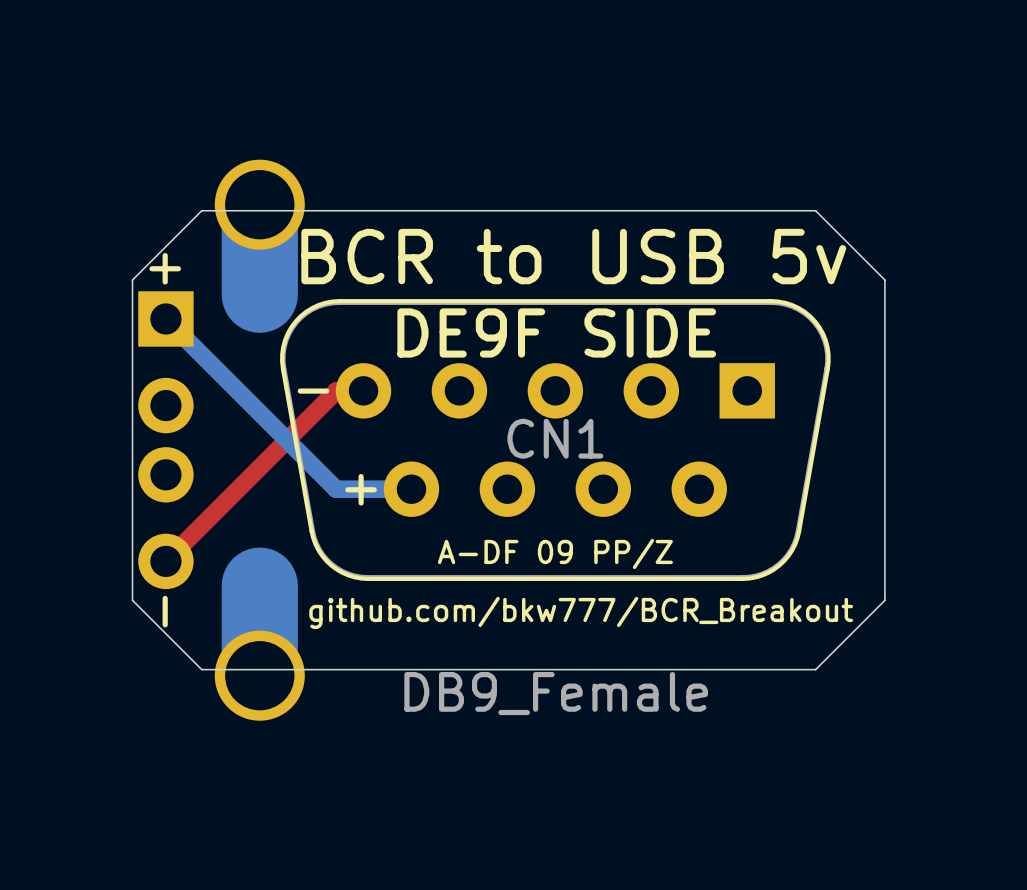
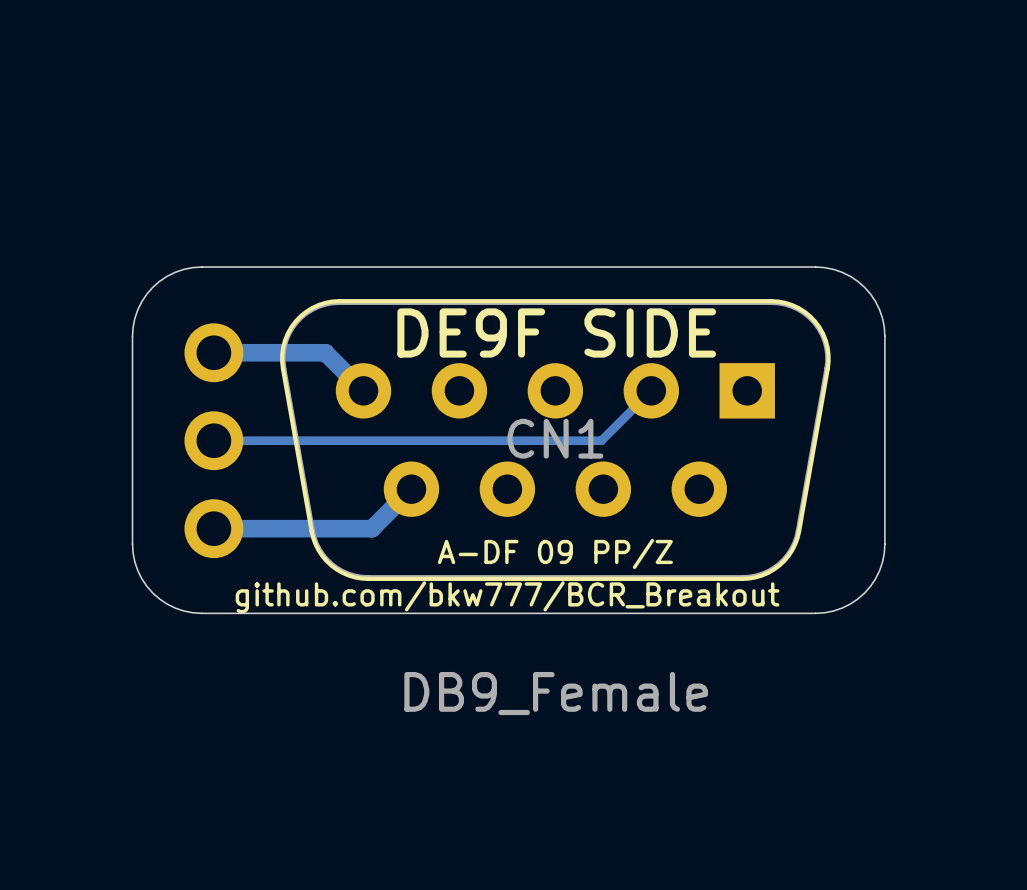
part footprint: [138, 159, 305, 721] -> [184, 323, 244, 559]
text: BCR to USB 5v (573, 256) -> none
text: + (165, 268) -> none
bottom track: (165, 318) (336, 489) (411, 489) -> (213, 528) (372, 528) (411, 489)
board edge: (884, 336) (884, 280) (815, 210) (201, 210) (132, 280) (132, 336) -> (884, 336) (879, 309) (864, 287) (842, 272) (815, 267) (192, 267) (167, 276) (152, 287) (137, 309) (132, 336)
bottom track: none -> (213, 352) (325, 352) (363, 390)
top track: (363, 390) (336, 390) (165, 561) -> none
bottom track: none -> (651, 390) (601, 440) (213, 440)
text: - (313, 391) -> none
text: + (361, 489) -> none
board edge: (884, 544) (884, 600) (815, 669) (201, 669) (132, 600) (132, 544) -> (884, 544) (879, 570) (864, 593) (842, 608) (815, 613) (192, 612) (167, 604) (152, 593) (137, 570) (132, 544)
text: - (165, 611) -> none
text position: github.com/bkw777/BCR_Breakout (581, 612) -> github.com/bkw777/BCR_Breakout (507, 597)

